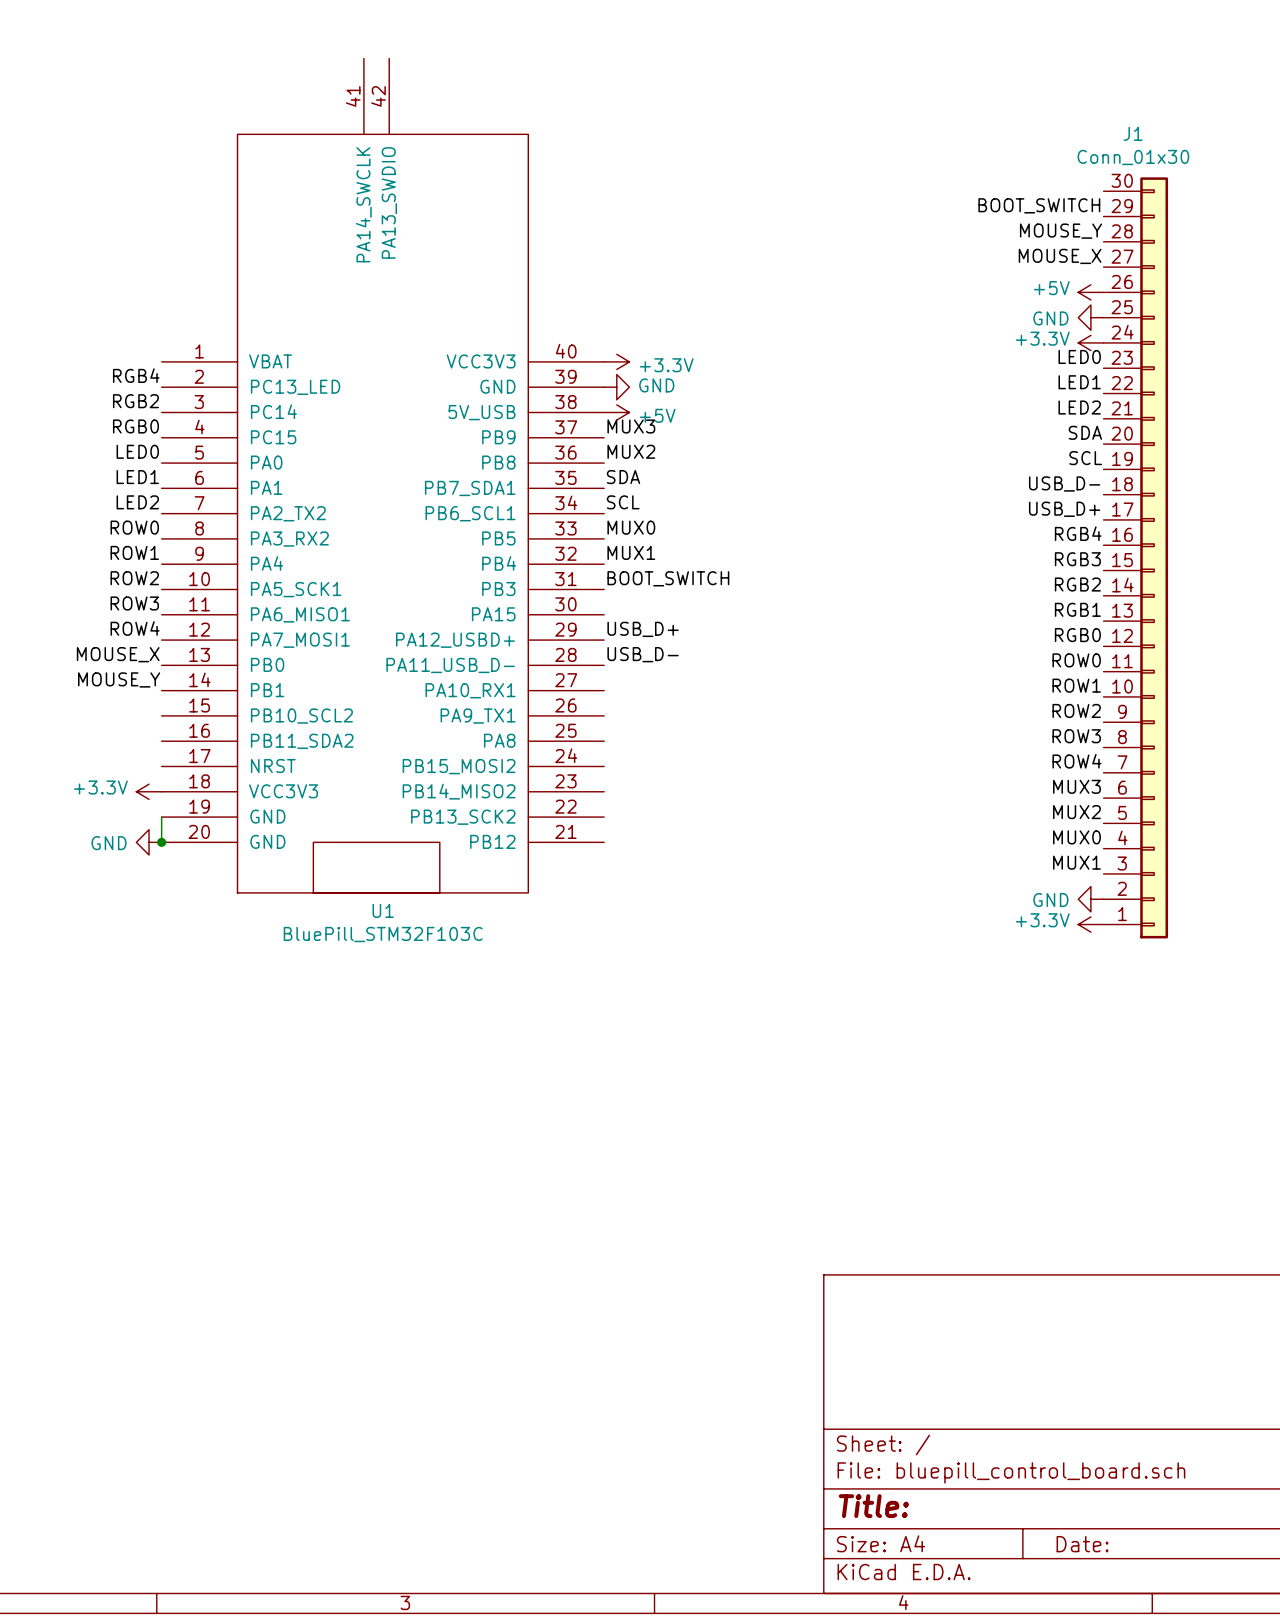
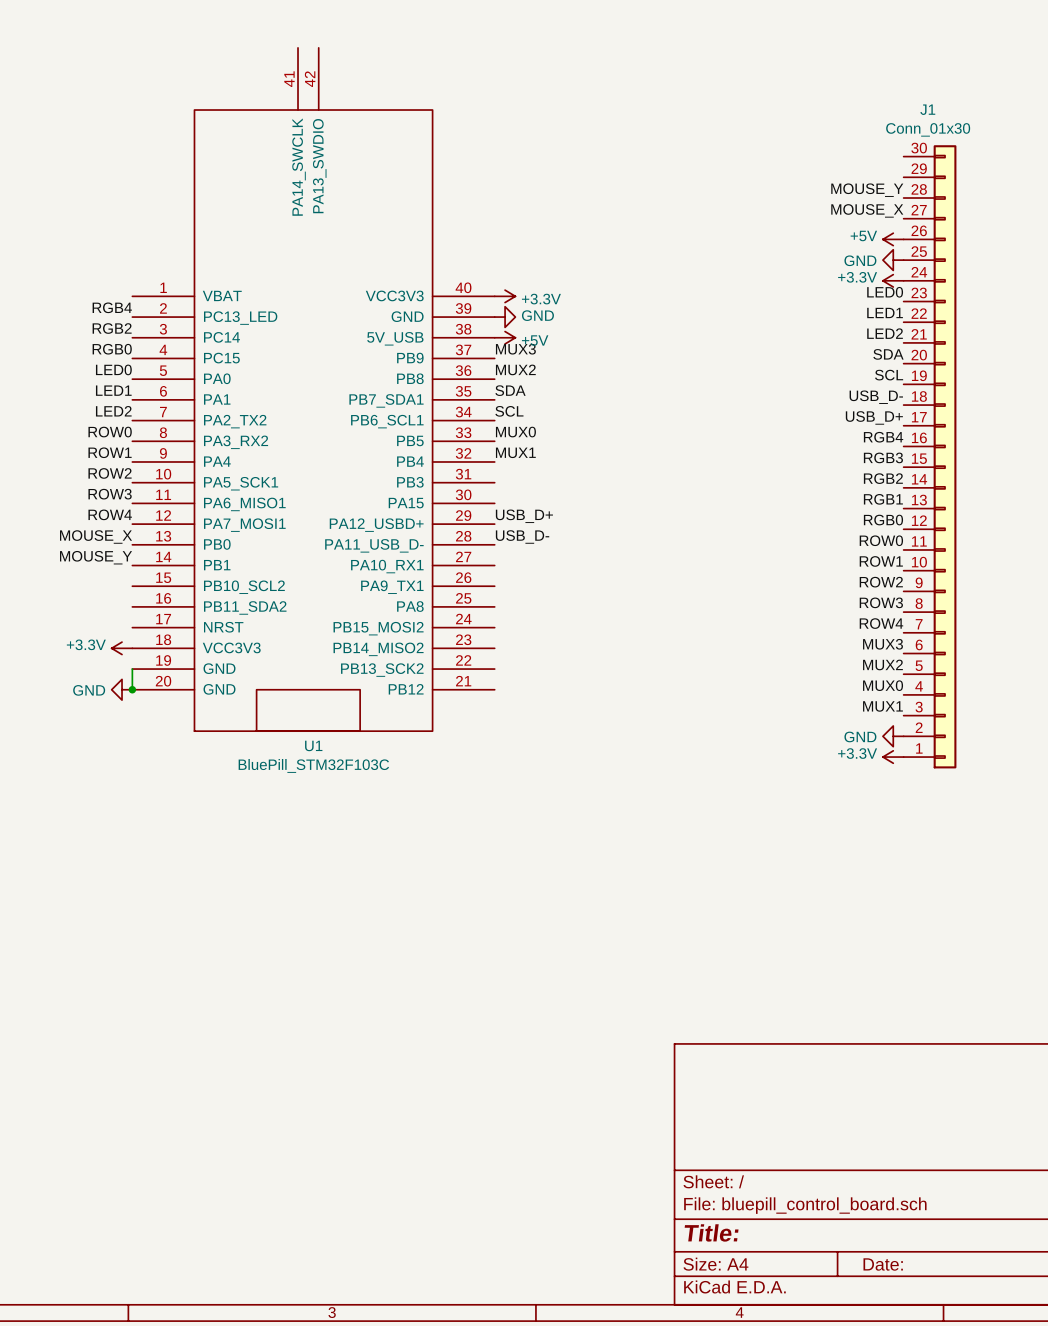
label: BOOT_SWITCH (1039, 205) -> none
label: BOOT_SWITCH (668, 578) -> none

